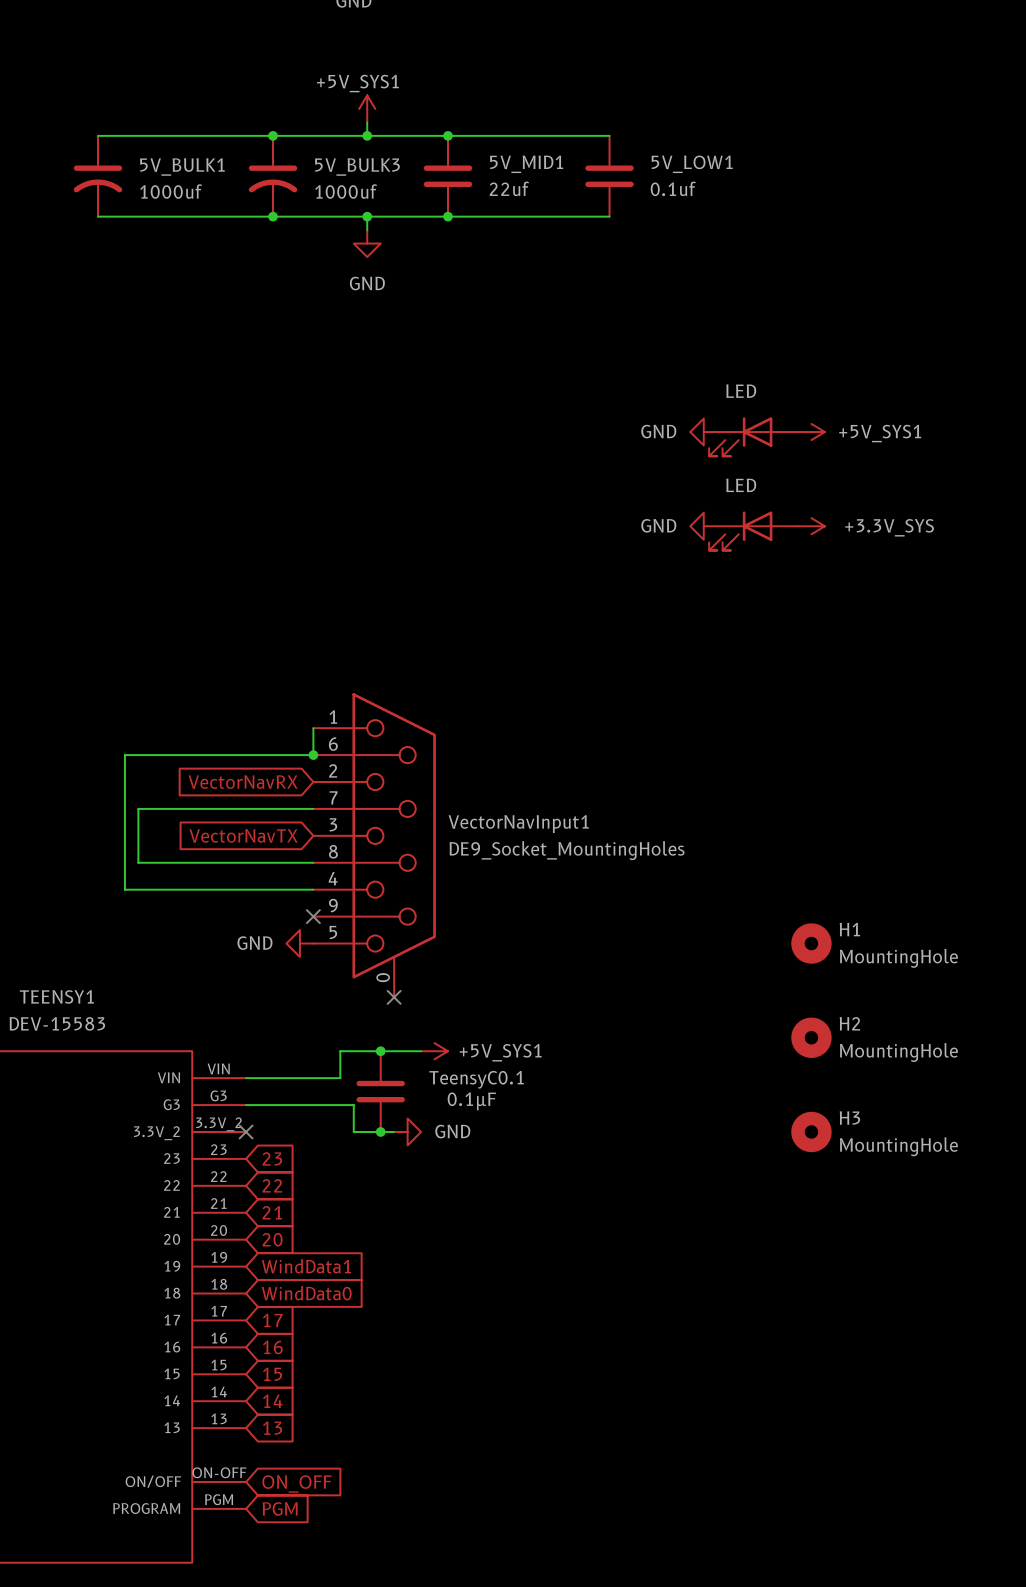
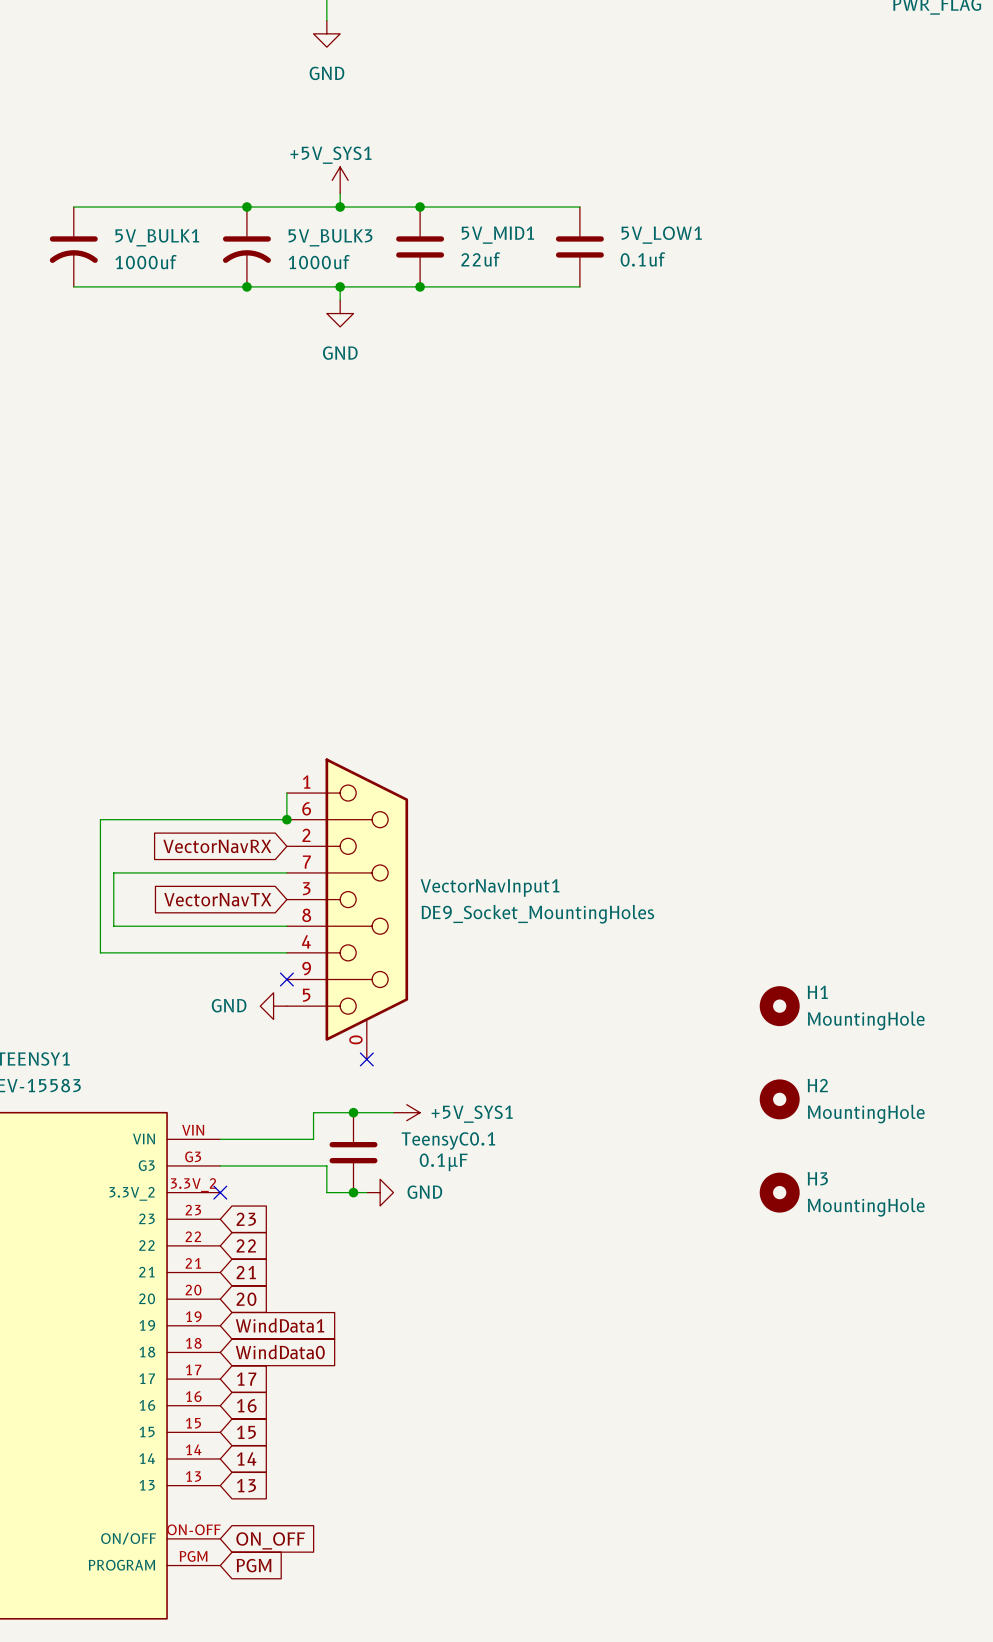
power symbol: GND (703, 432) -> none
power symbol: +5V_SYS1 (811, 432) -> none
part: LED (753, 436) -> none
power symbol: GND (703, 526) -> none
power symbol: +3.3V_SYS (811, 526) -> none
part: LED (753, 530) -> none

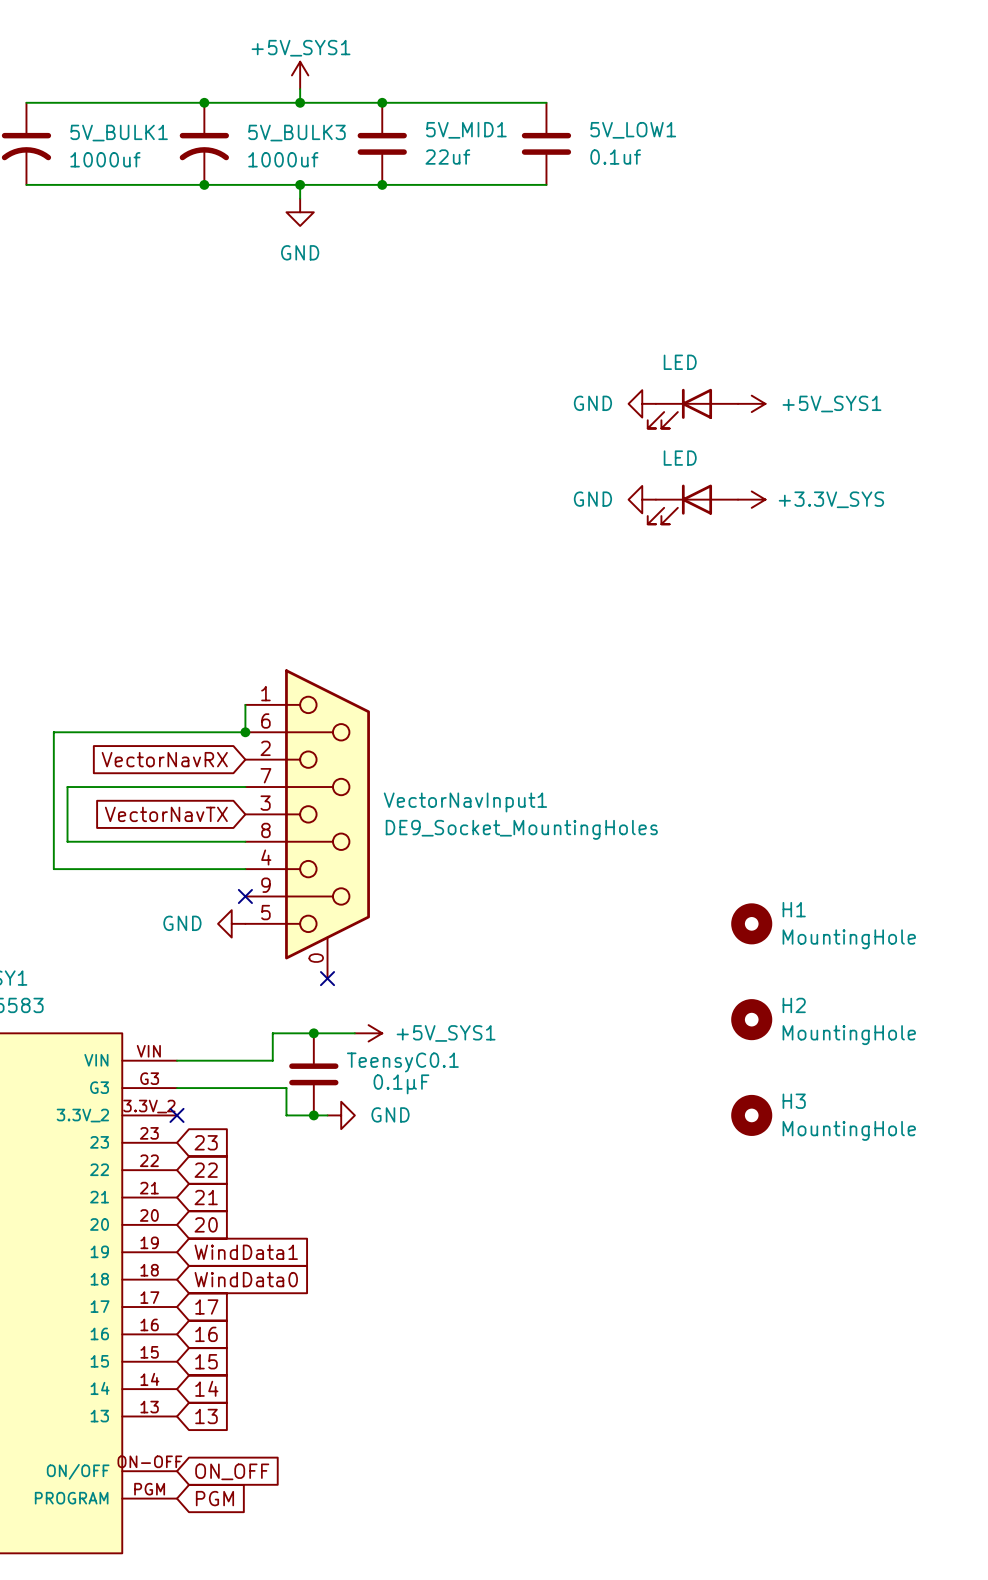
power symbol: none -> GND (642, 403)
power symbol: none -> +5V_SYS1 (751, 403)
part: none -> LED (692, 408)
power symbol: none -> GND (642, 499)
power symbol: none -> +3.3V_SYS (751, 499)
part: none -> LED (692, 504)

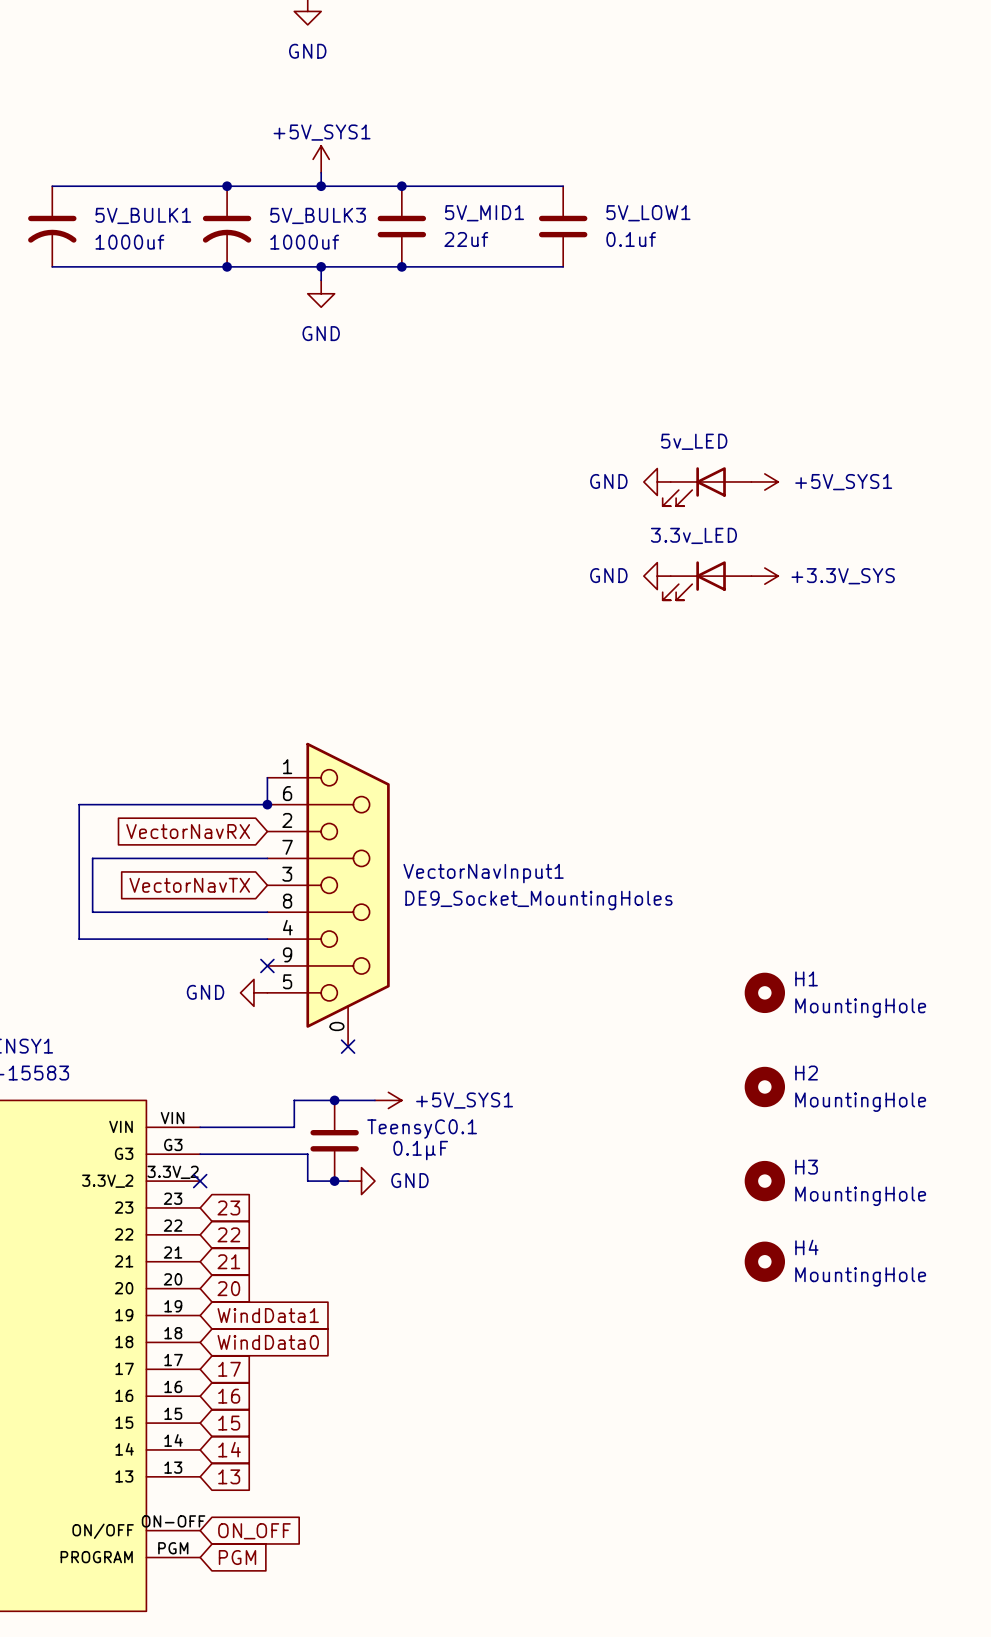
part value: LED (680, 362) -> 5v_LED (694, 441)
part value: LED (680, 458) -> 3.3v_LED (693, 535)
H4: none -> MountingHole (764, 1261)

